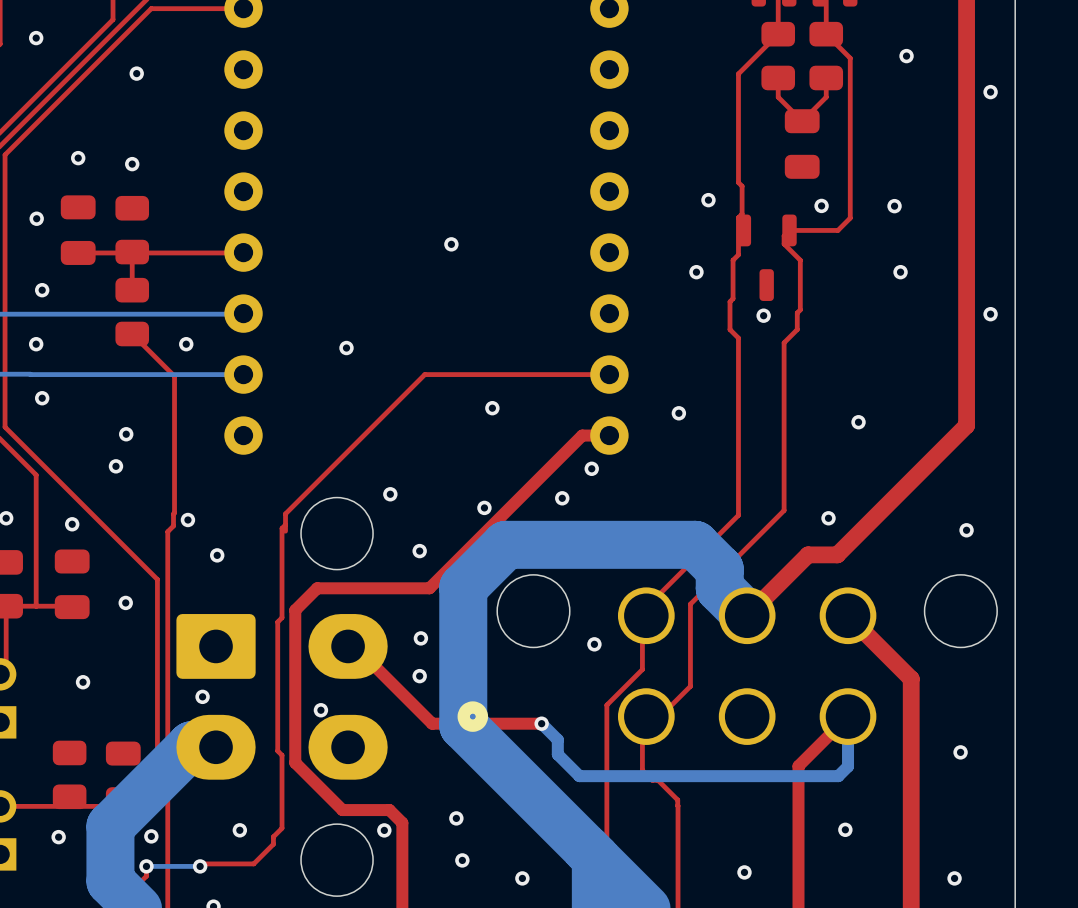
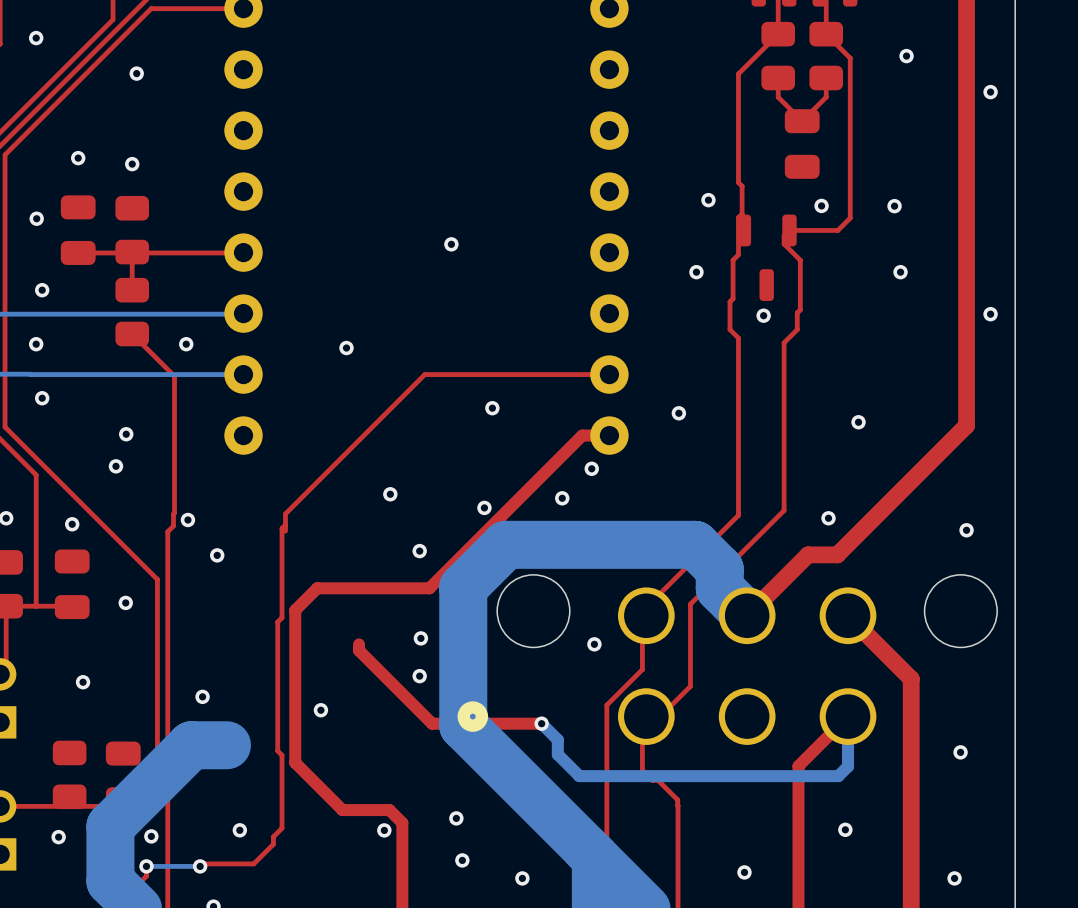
part: (282, 696) -> none

